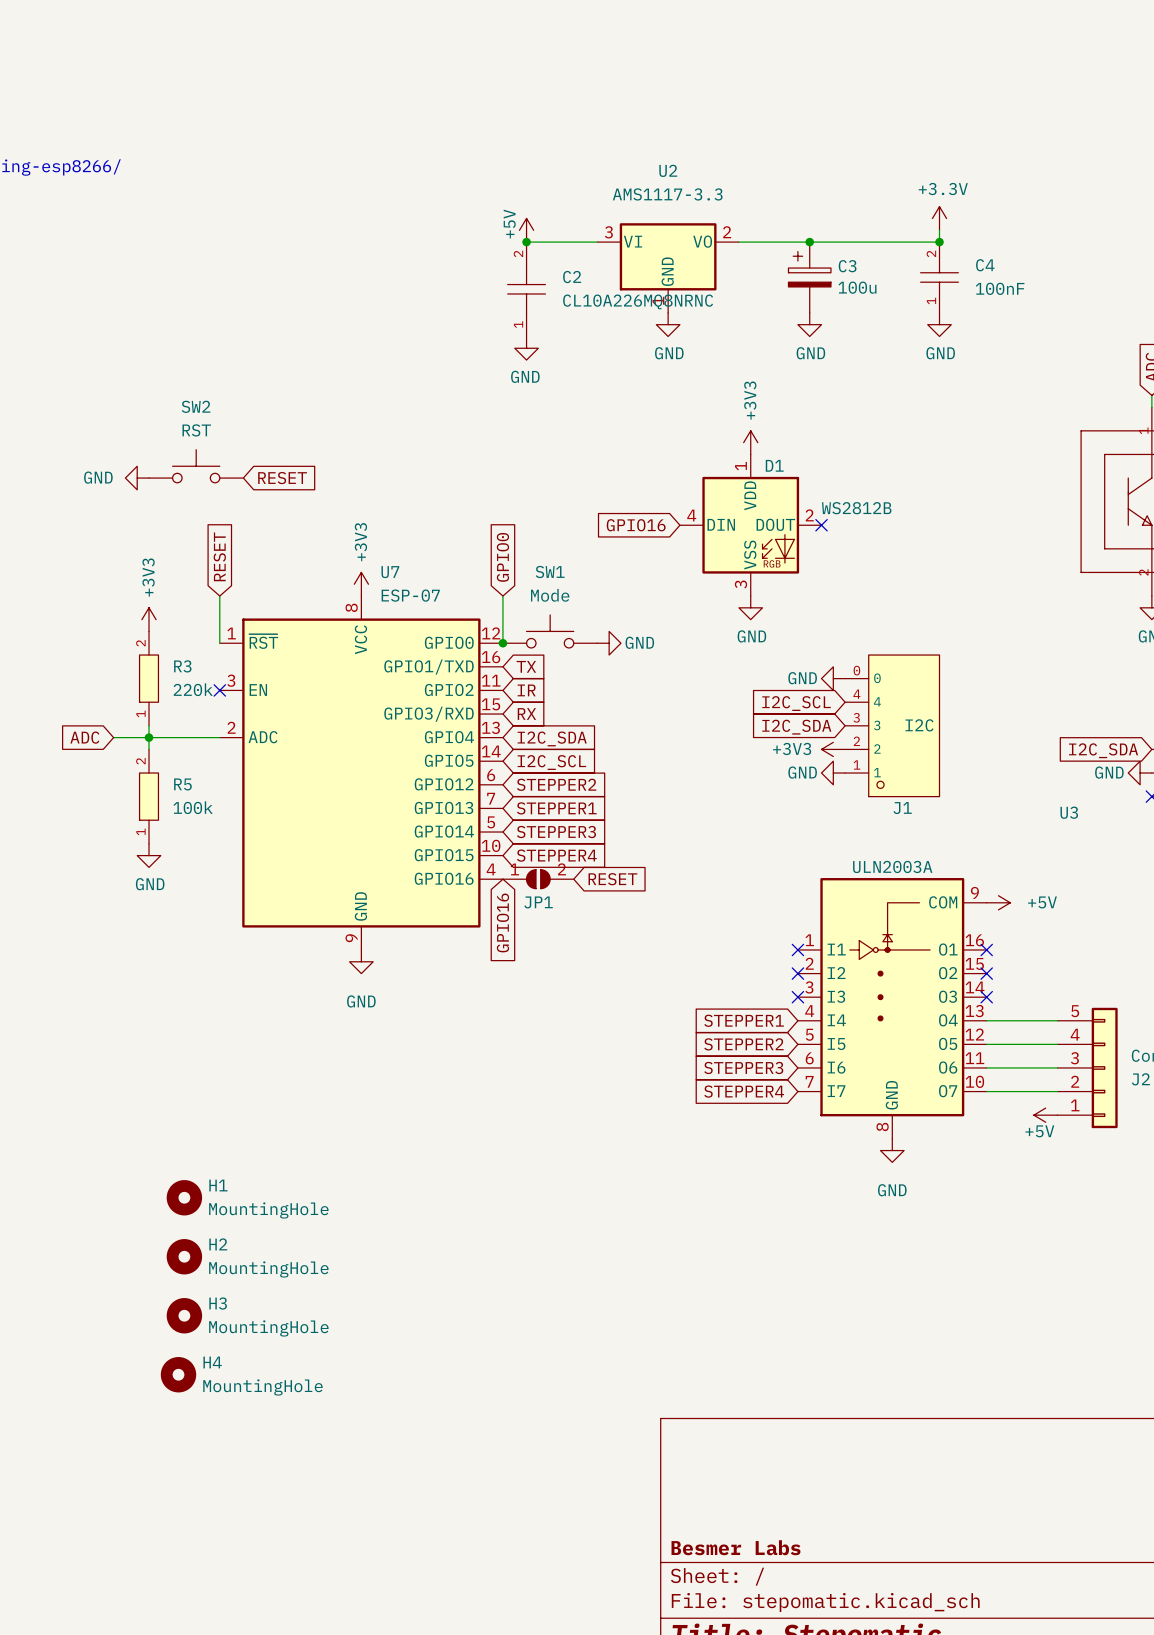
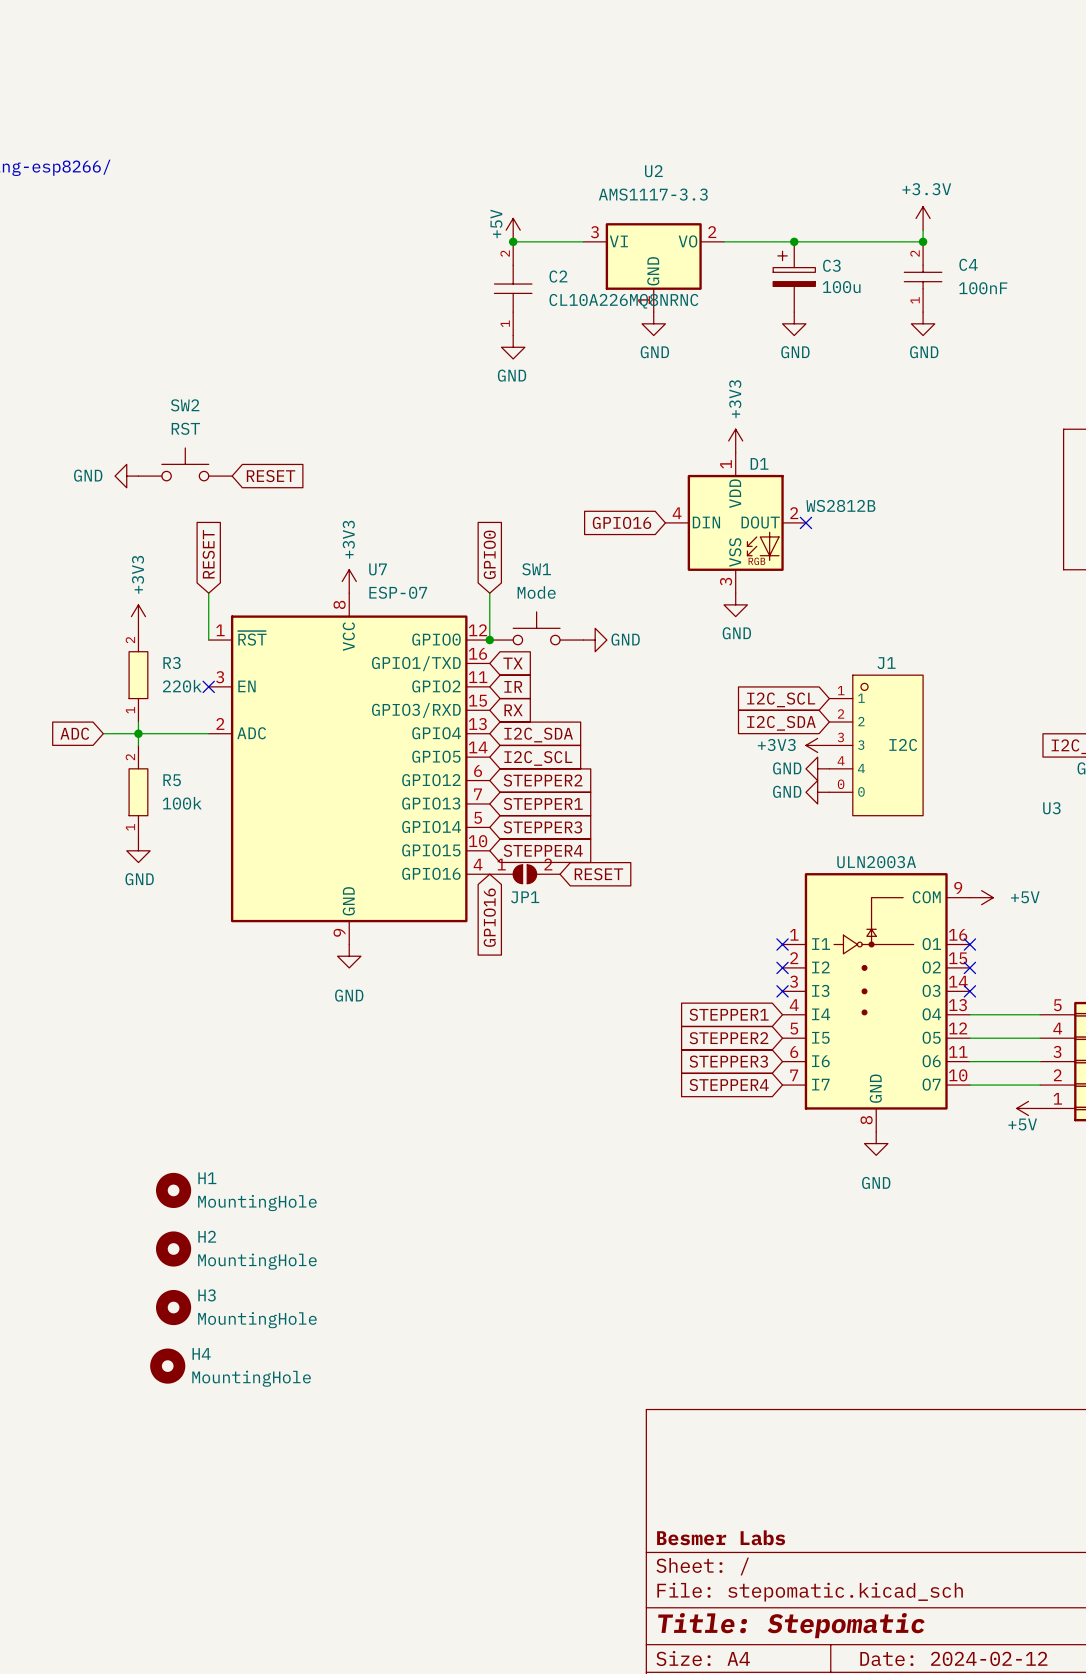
power symbol position: GND (833, 678) -> GND (817, 792)
J1 flip: as is (904, 725) -> up-down (887, 745)

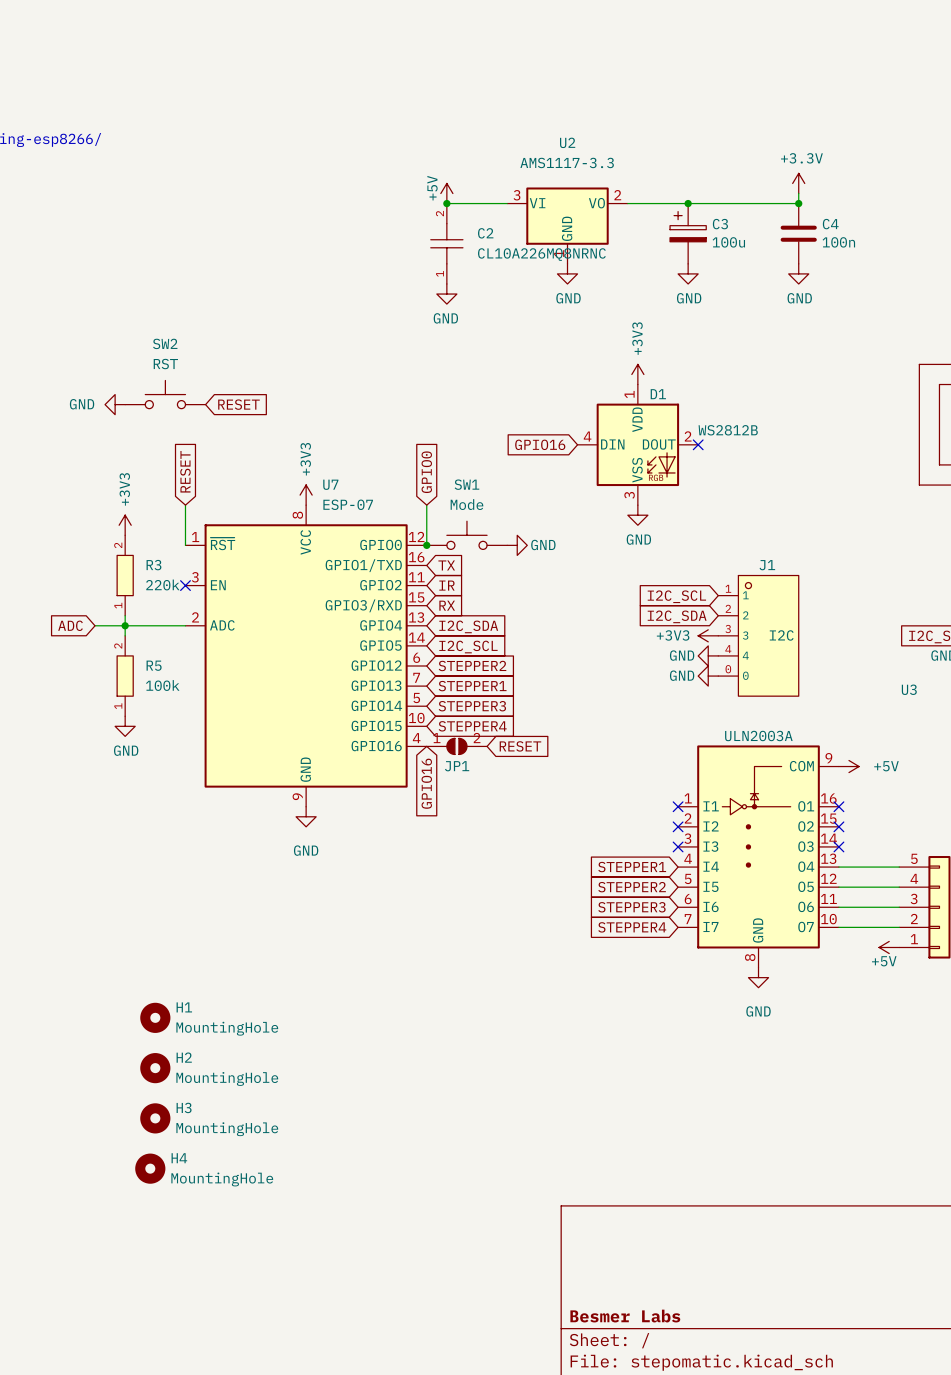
C4 symbol: [904, 241, 942, 313] -> [780, 203, 817, 264]
C4 value: 100nF (983, 288) -> 100n (838, 242)

